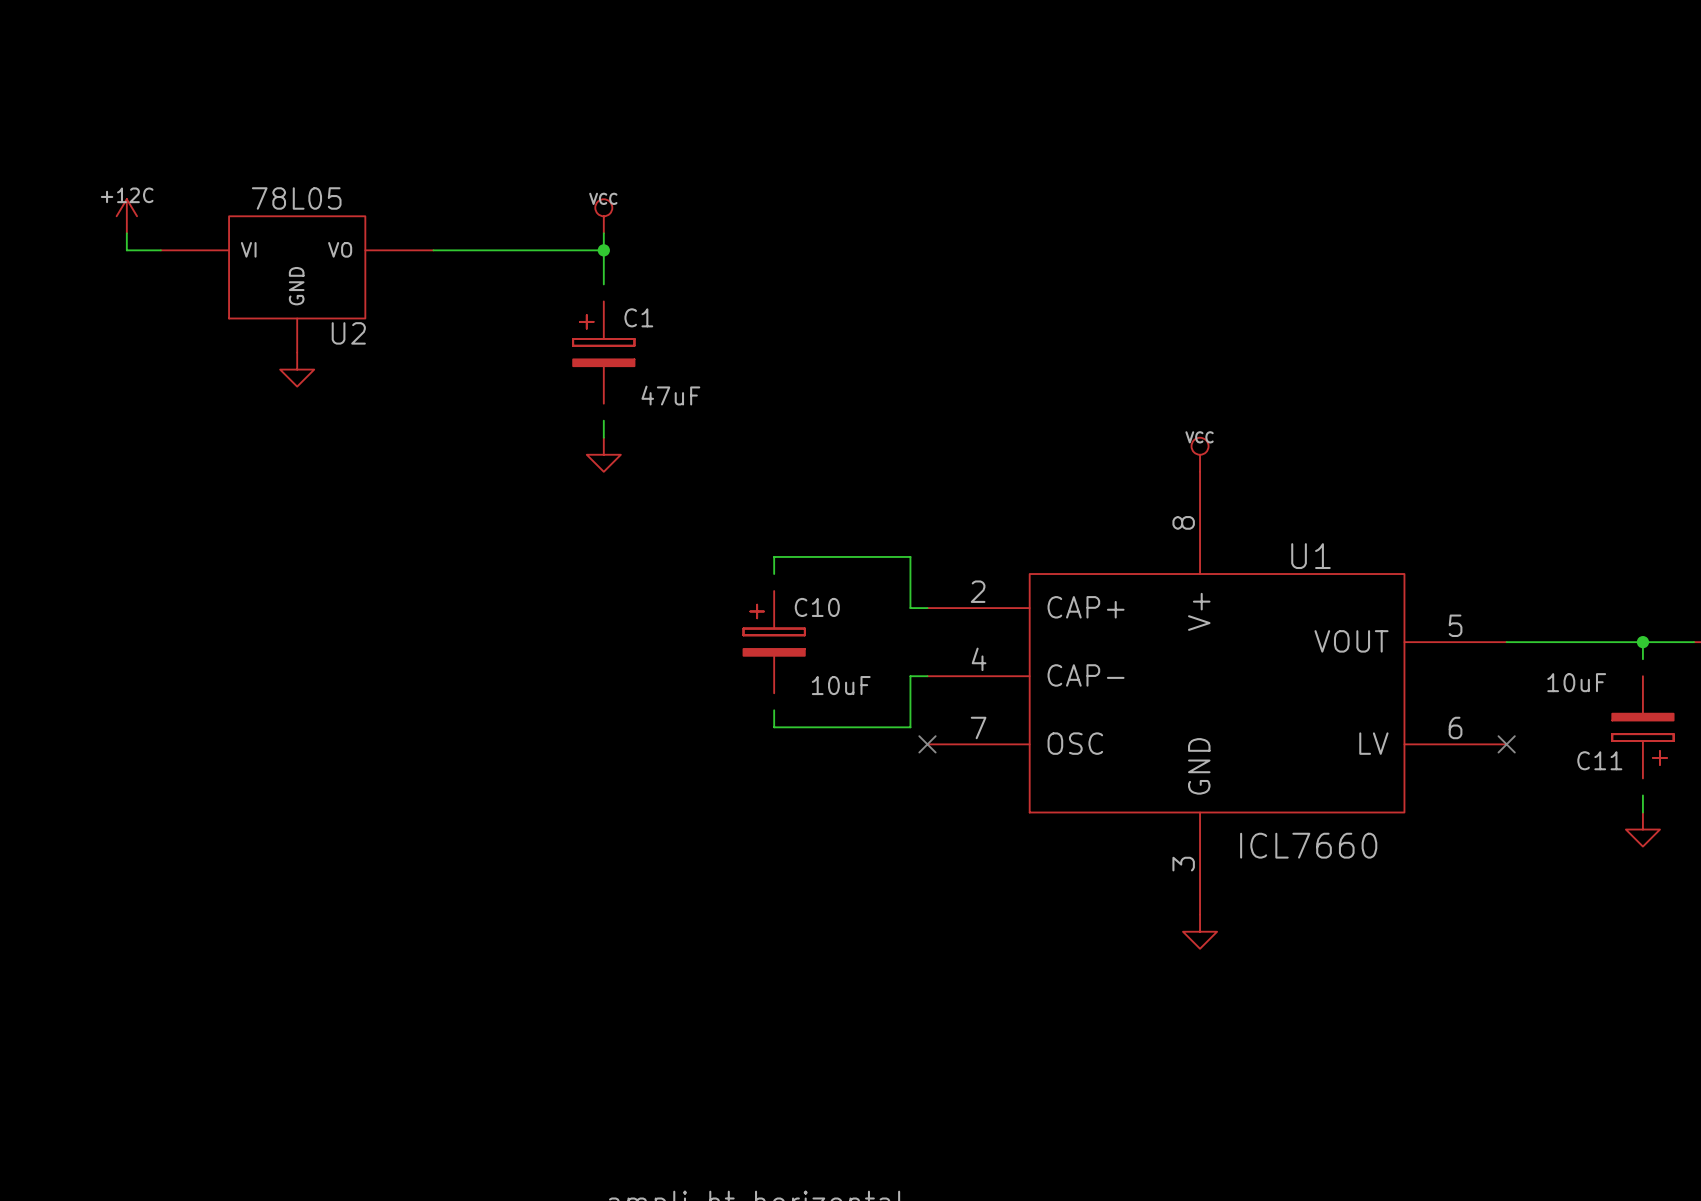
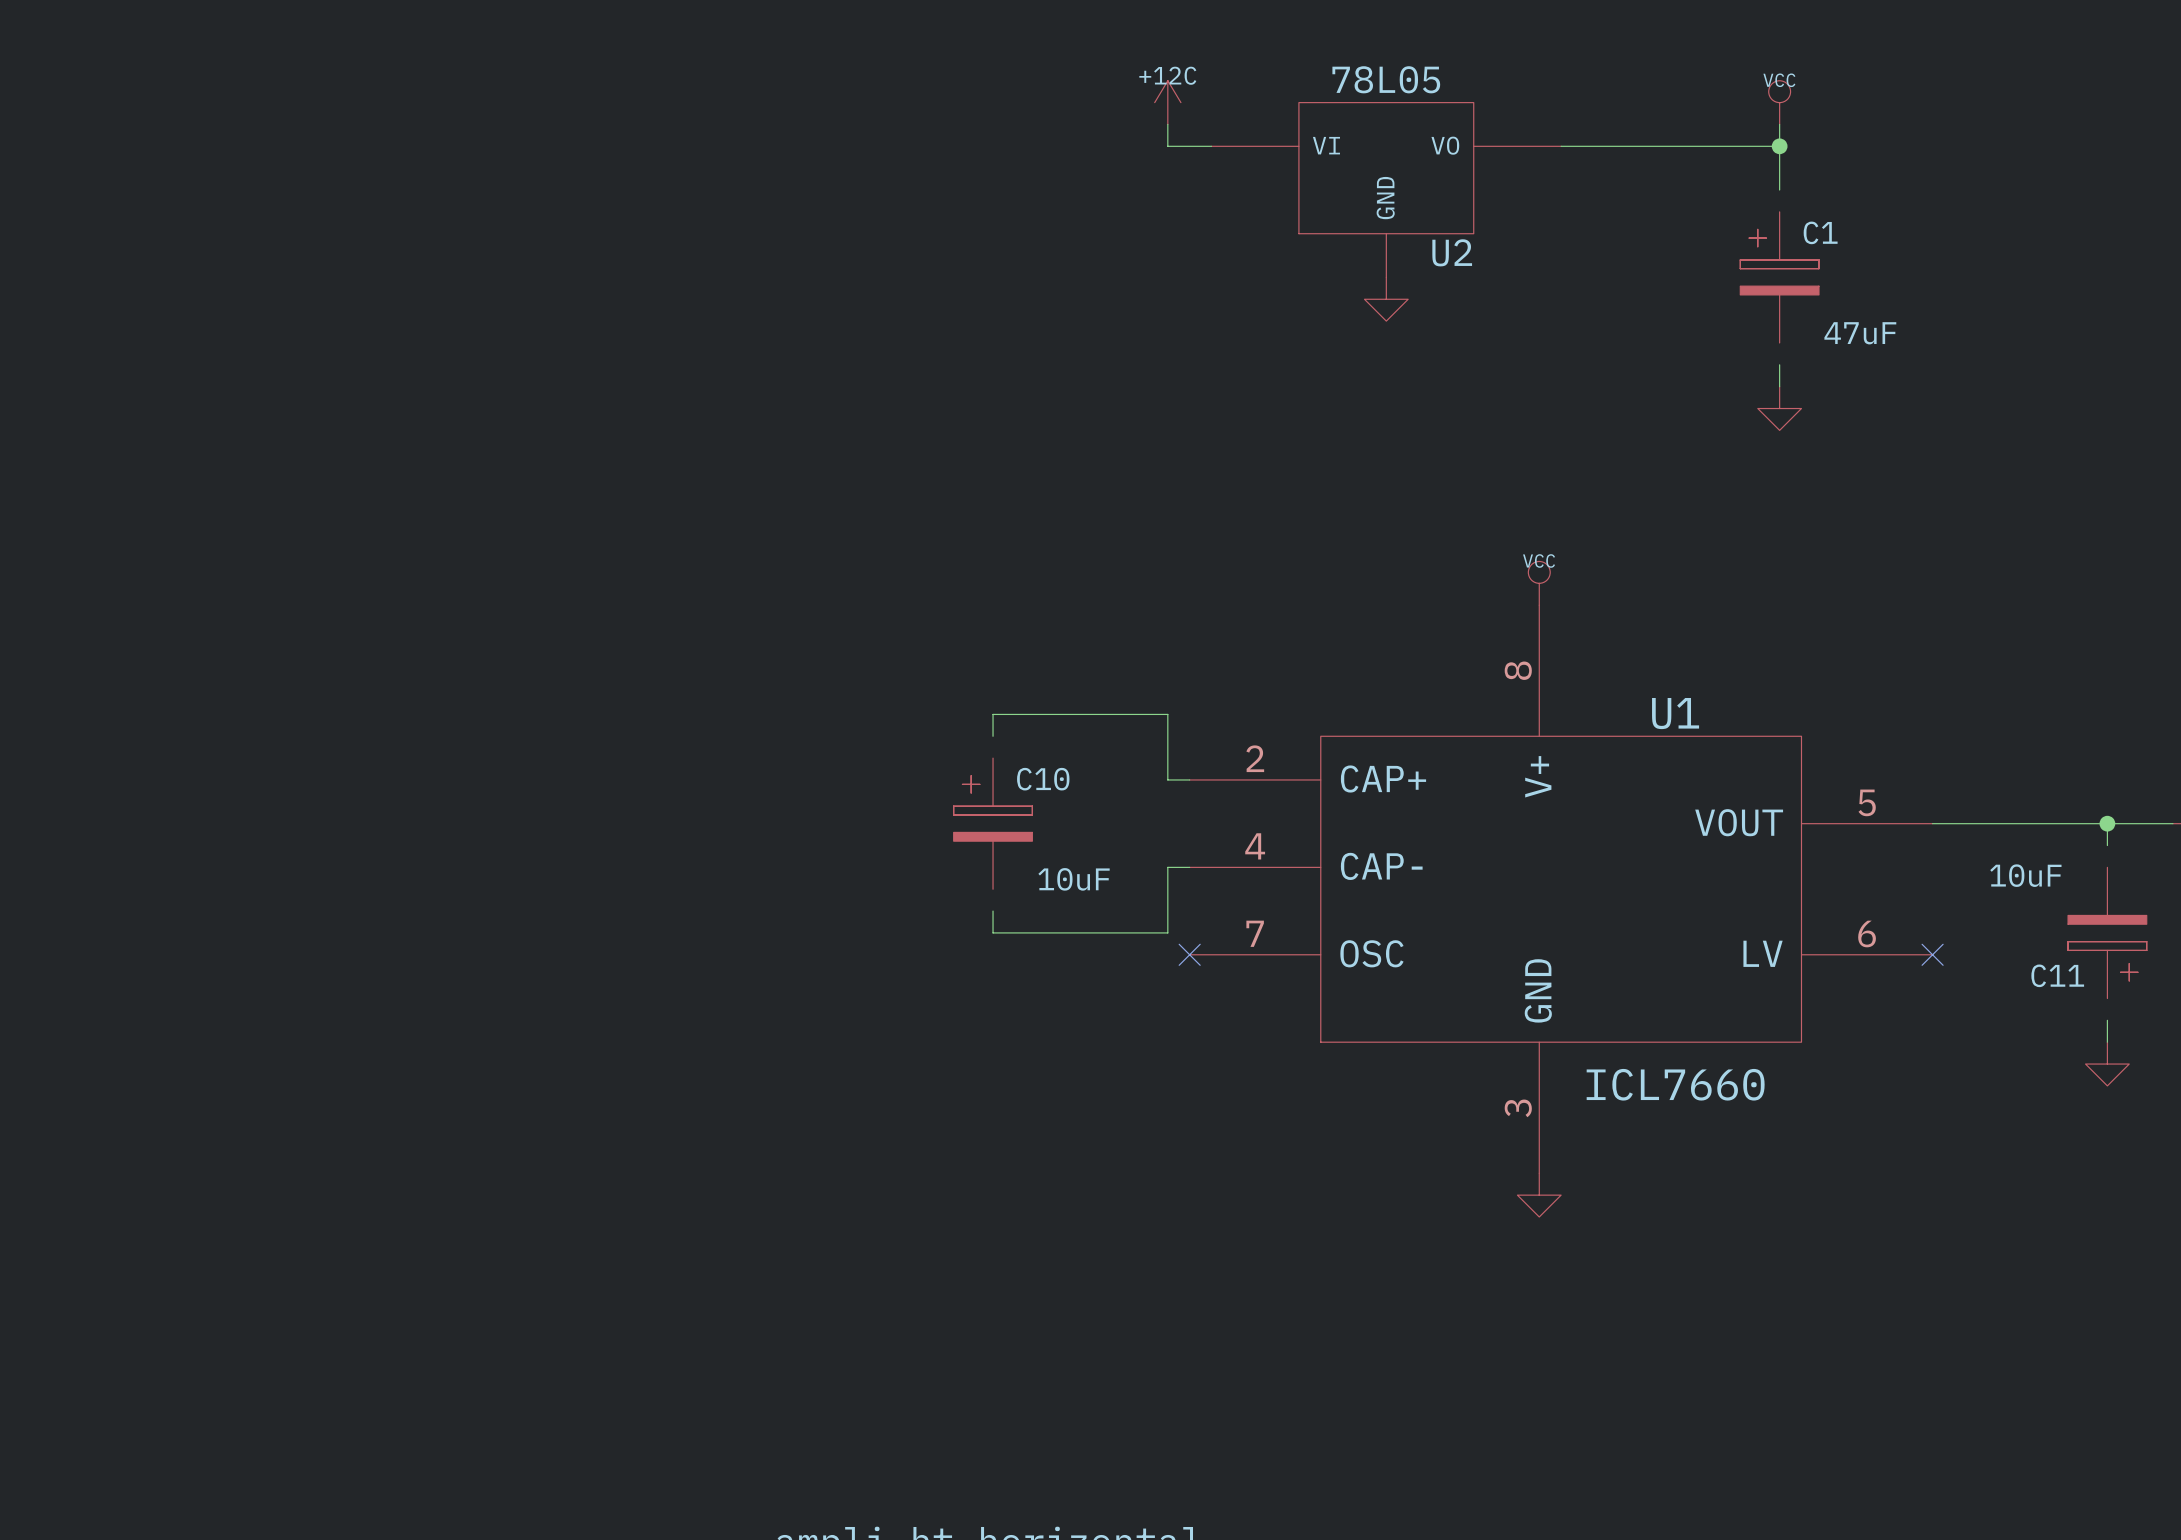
power symbol: none -> +12C (1167, 102)
power symbol: none -> VCC (1779, 102)
wire: none -> (1167, 124) (1167, 146) (1211, 146)
wire: none -> (1779, 124) (1779, 190)
wire: none -> (1561, 146) (1779, 146)
junction: none -> (1779, 146)
power symbol: +12C (126, 216) -> none
power symbol: VCC (603, 216) -> none
wire: (126, 233) (126, 250) (160, 250) -> none
wire: (603, 233) (603, 284) -> none
power symbol: none -> (1386, 299)
wire: (433, 250) (603, 250) -> none
junction: (603, 250) -> none
U2 position: (297, 284) -> (1386, 190)
wire: none -> (1779, 364) (1779, 386)
power symbol: none -> (1779, 408)
C1 position: (603, 352) -> (1779, 277)
power symbol: (297, 369) -> none
wire: (603, 420) (603, 437) -> none
power symbol: (603, 454) -> none

